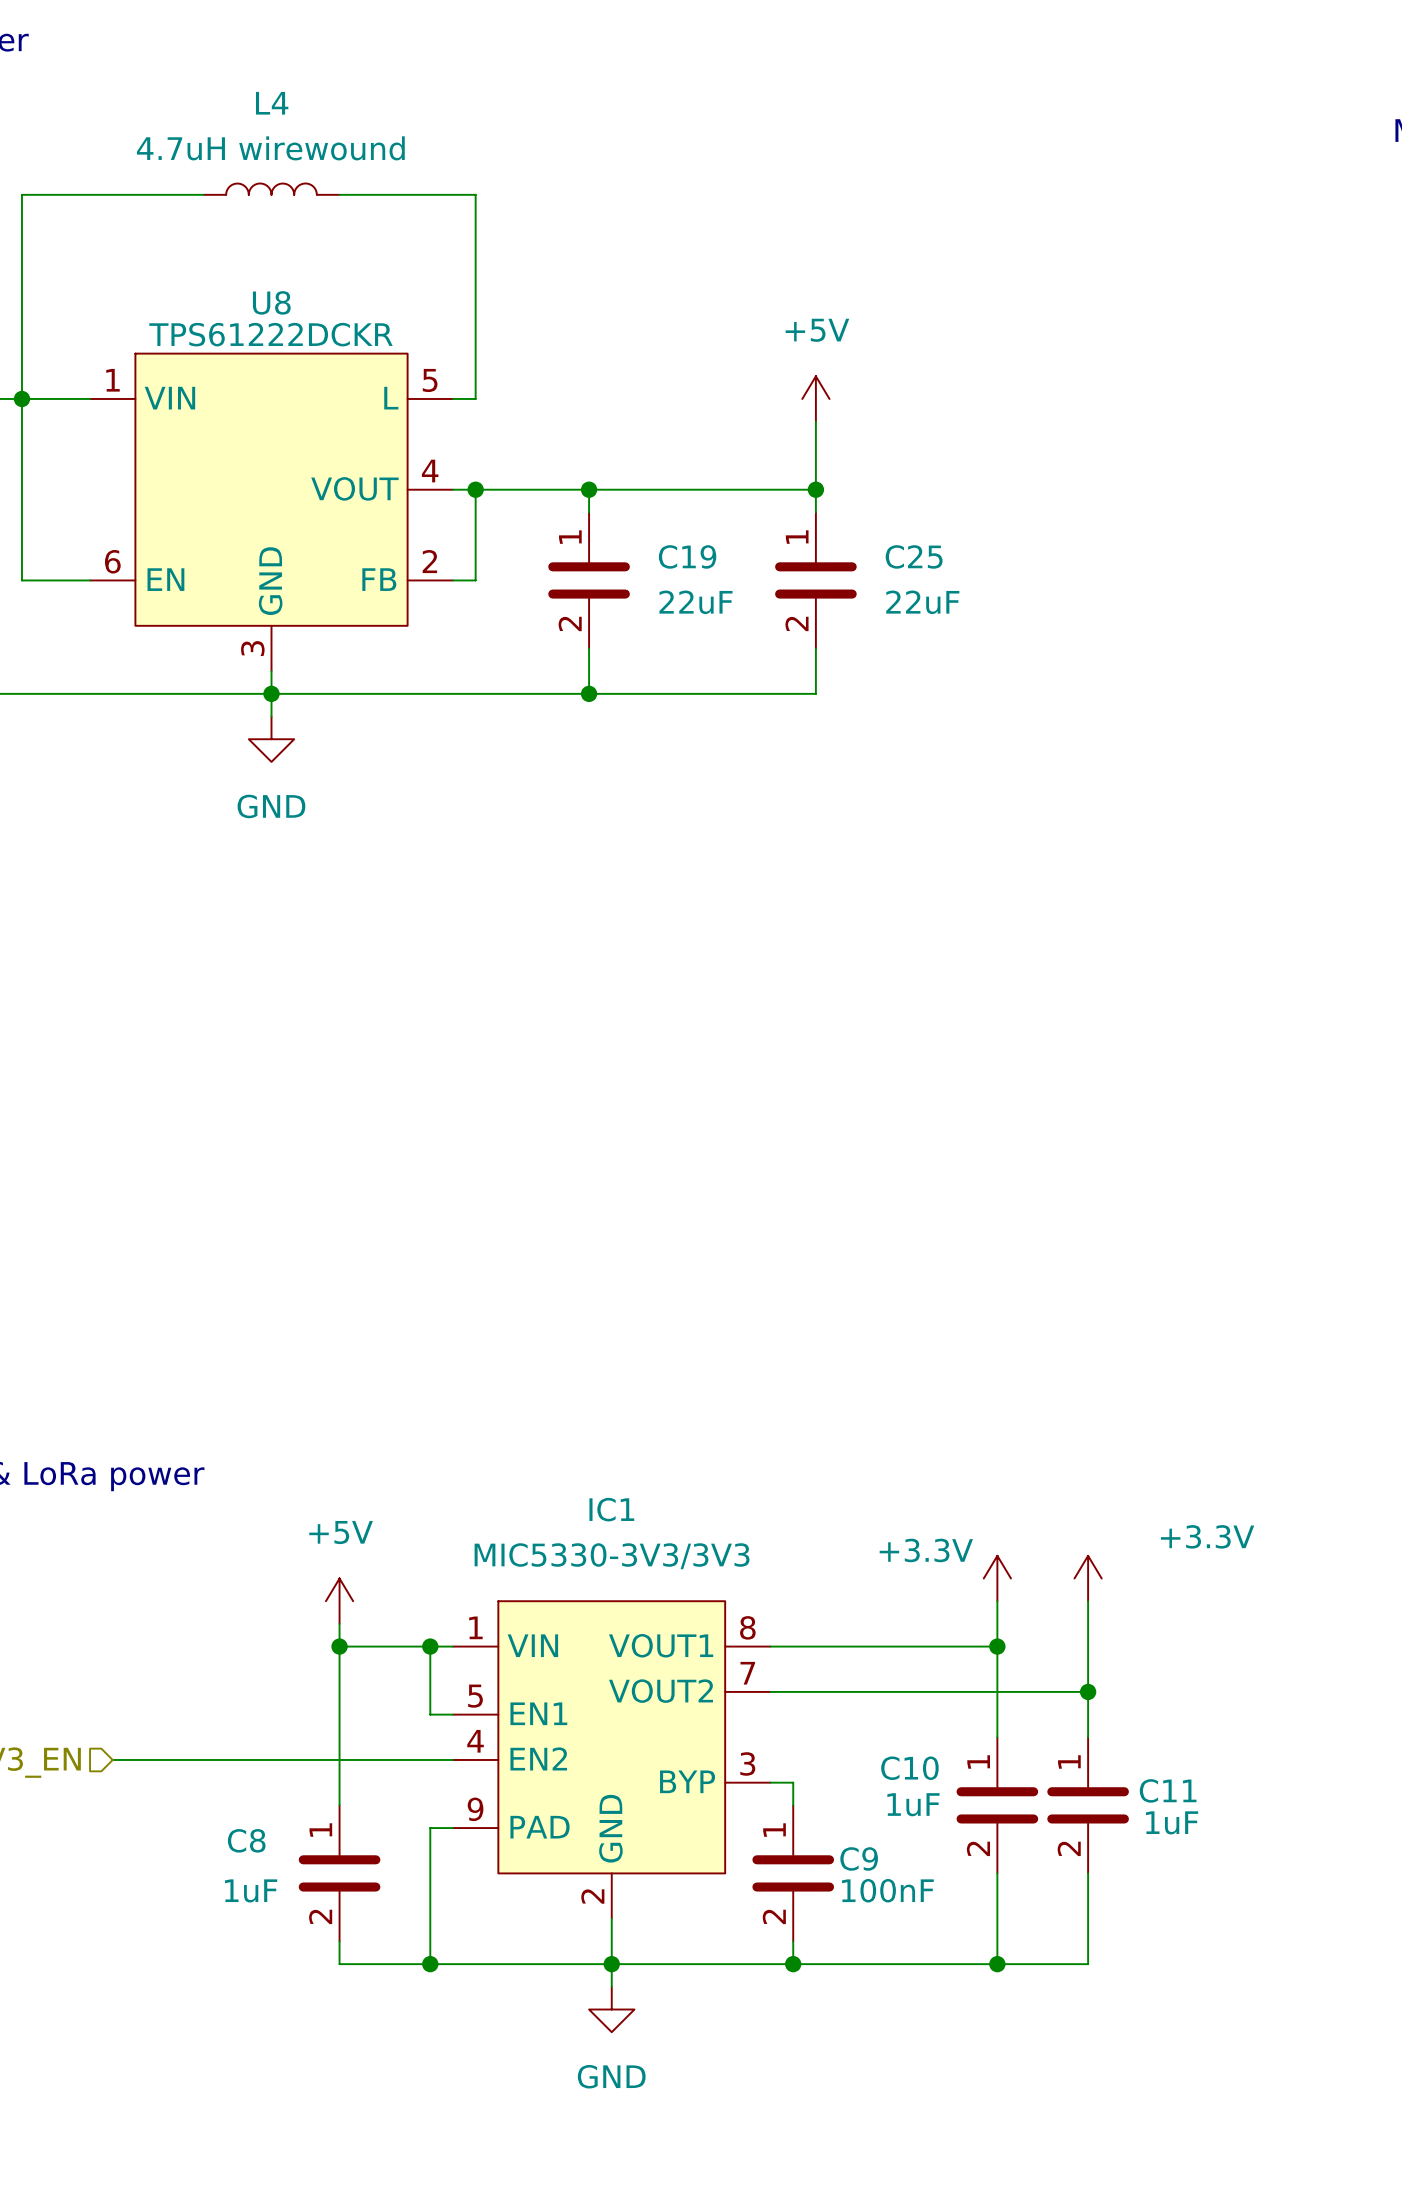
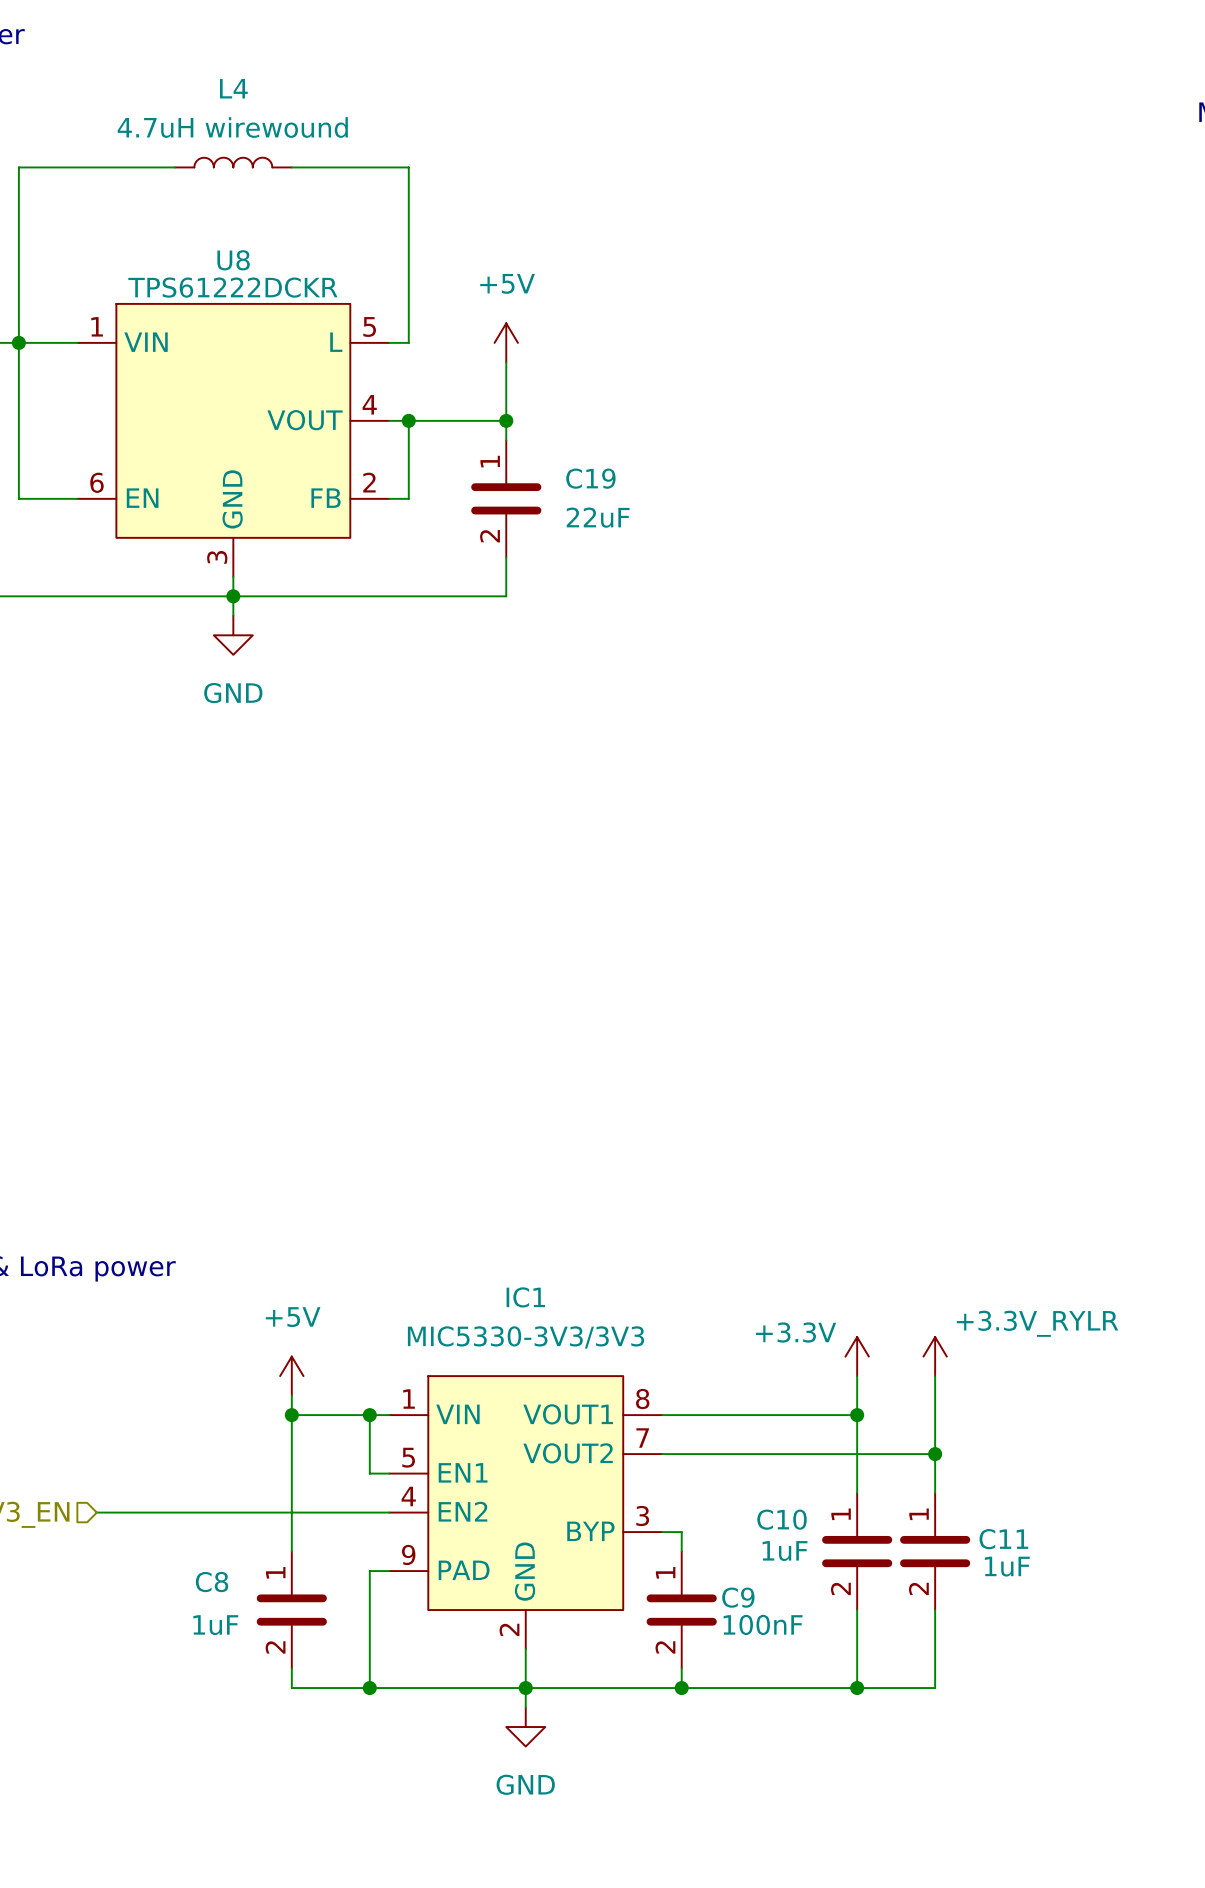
power symbol position: +5V (815, 398) -> +5V (506, 342)
wire: (815, 421) (815, 512) -> none
wire: (589, 489) (815, 489) -> (506, 420) (506, 362)
junction: (815, 489) -> none
C25: (815, 580) -> none
wire: (815, 648) (815, 693) (589, 693) -> none
junction: (589, 693) -> none
power symbol: +3.3V (1088, 1578) -> +3.3V_RYLR (935, 1356)

